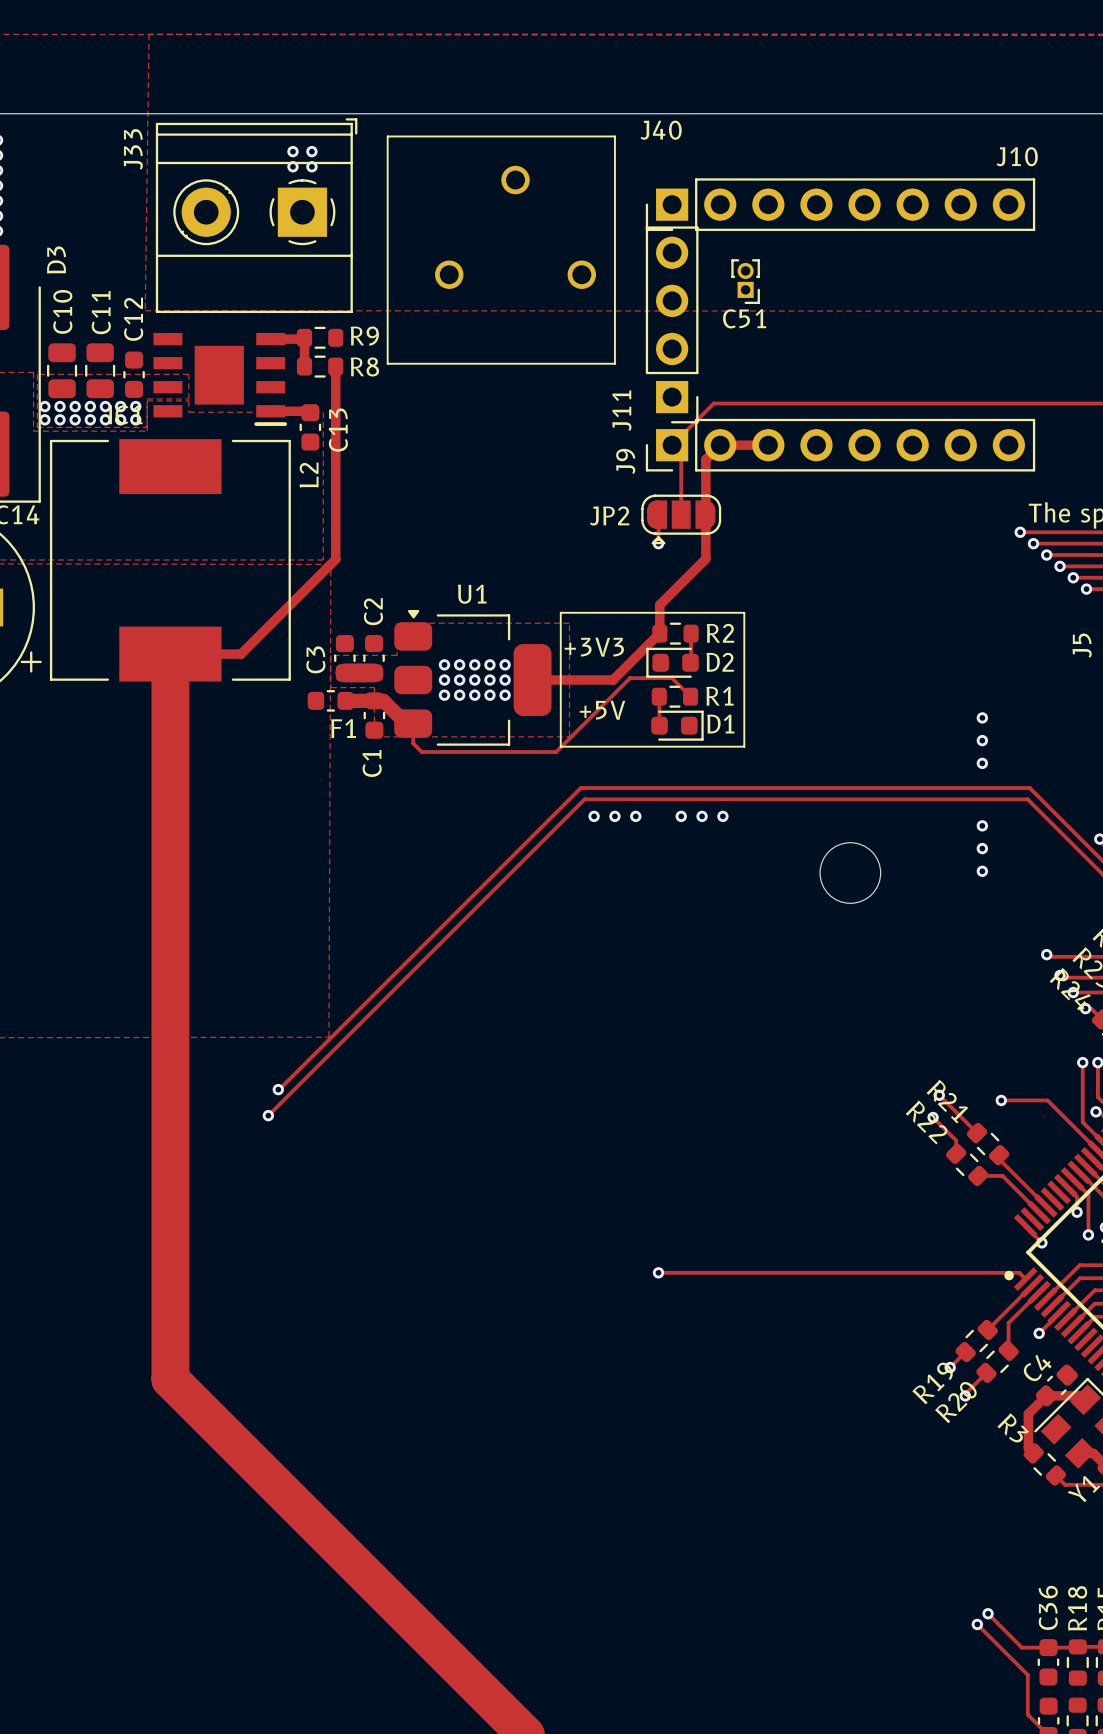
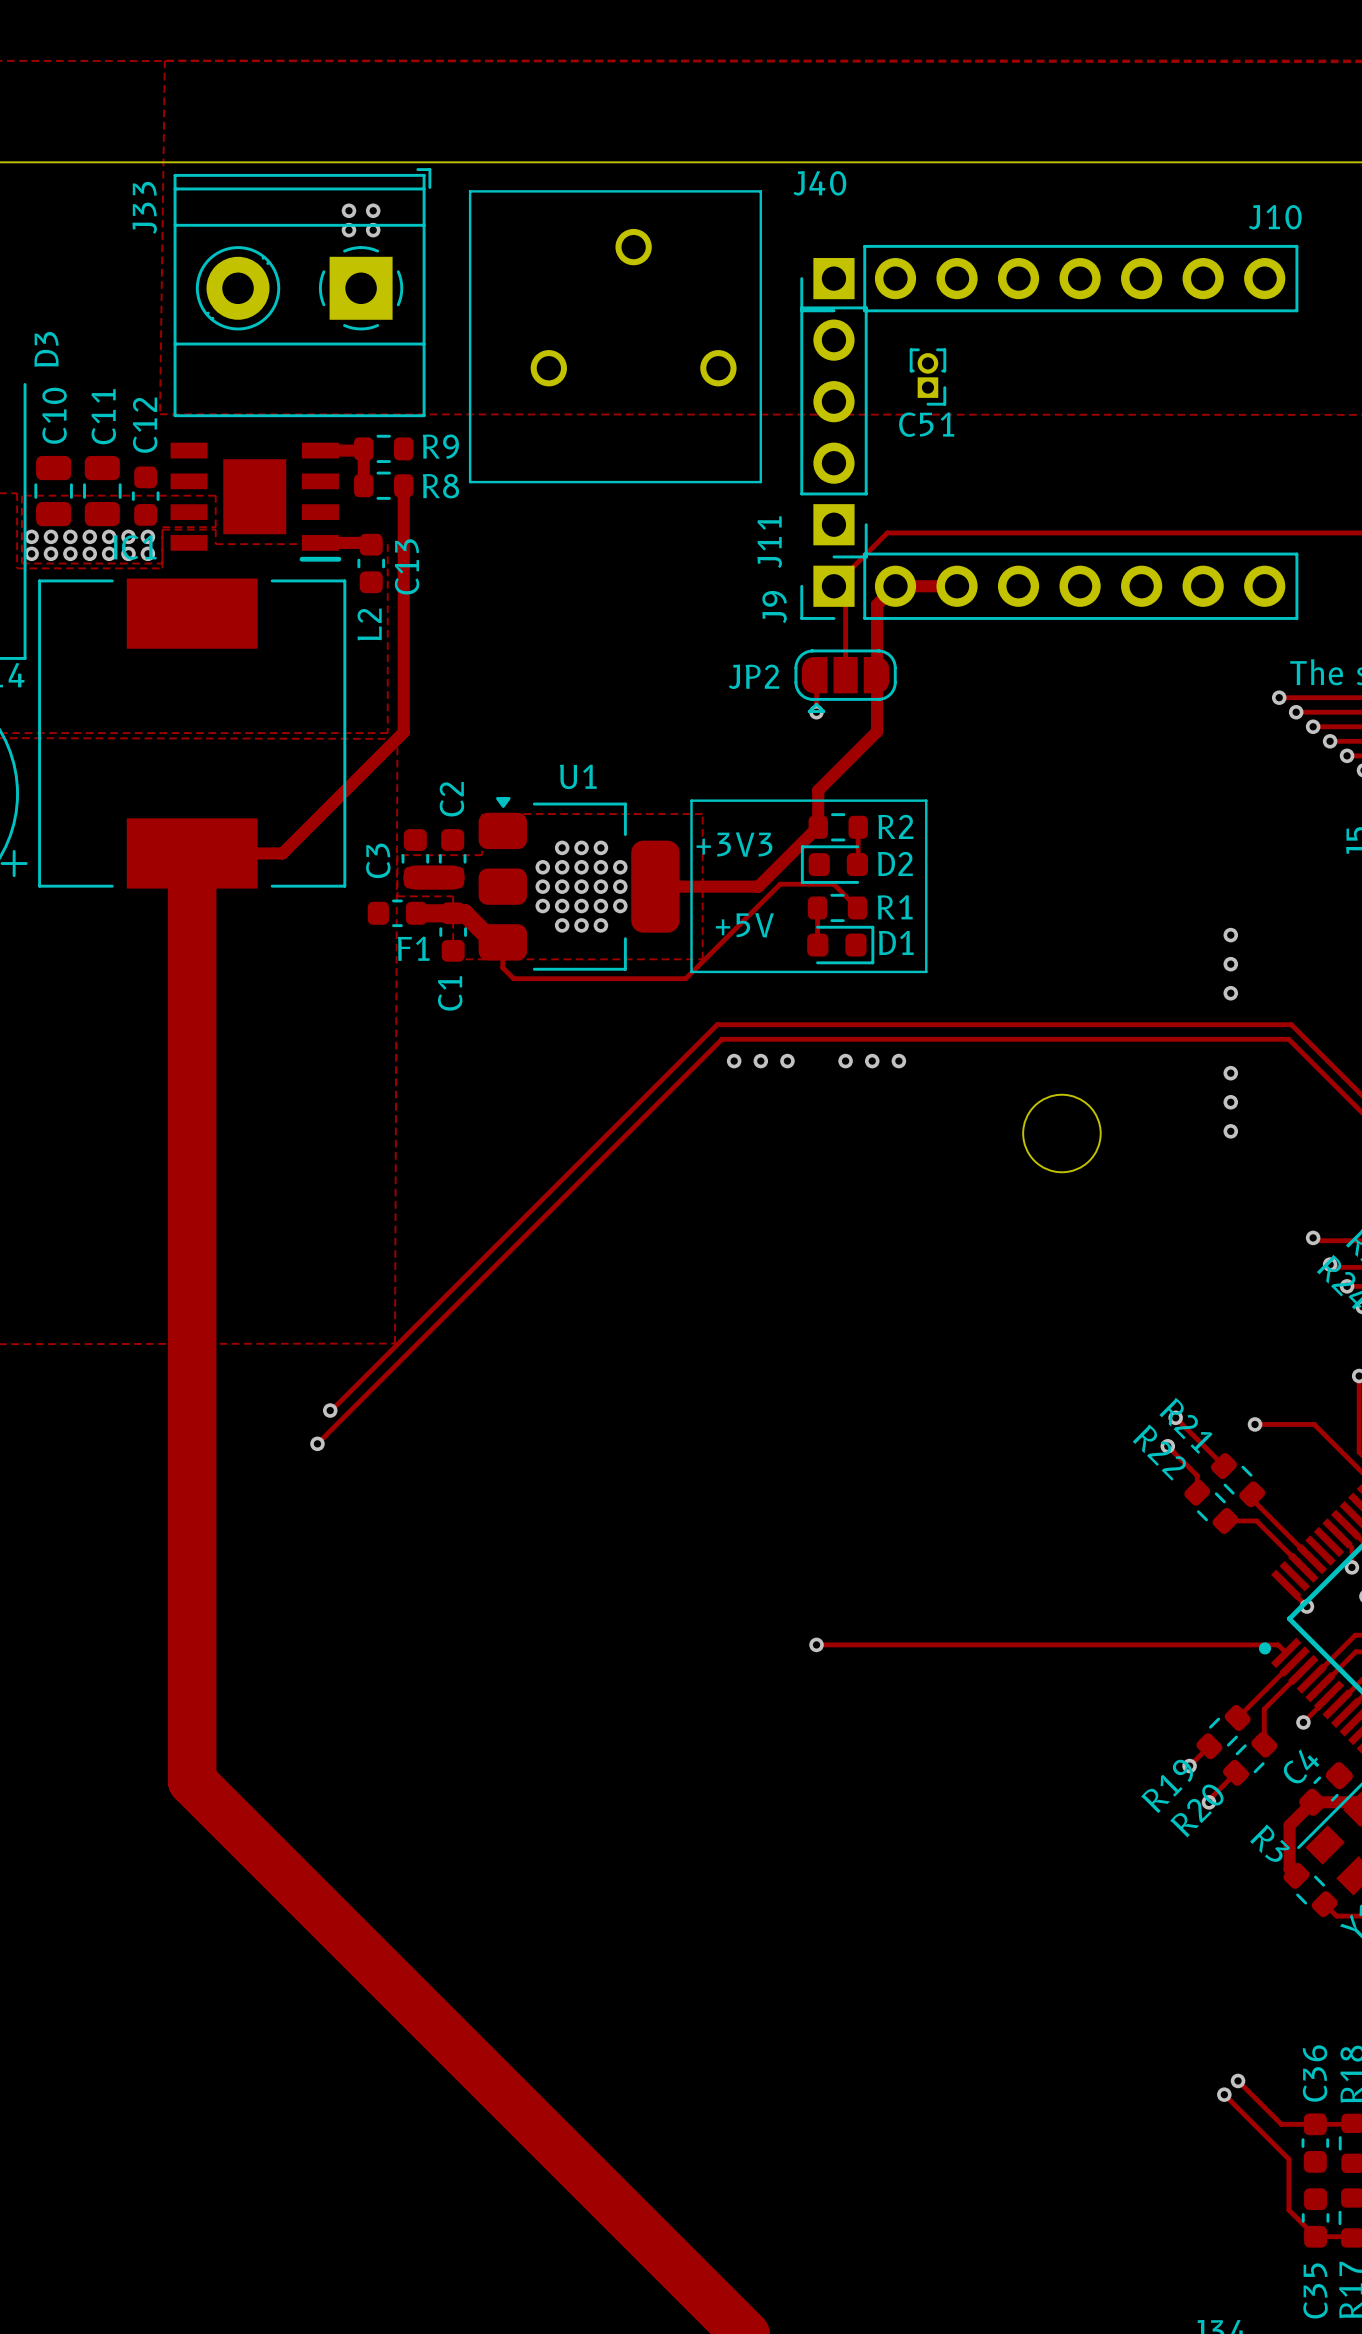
via: none -> (562, 847)
via: none -> (581, 847)
via: none -> (600, 847)
via: none -> (562, 925)
via: none -> (581, 925)
via: none -> (600, 925)

